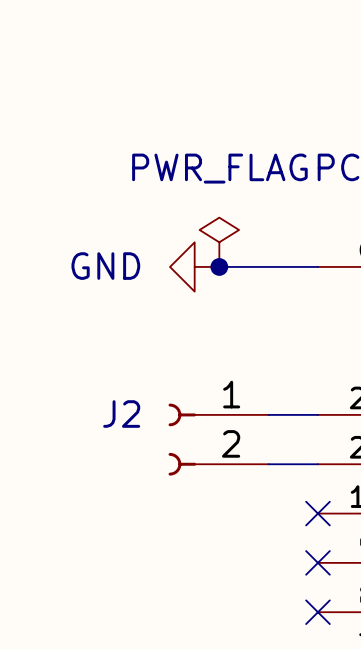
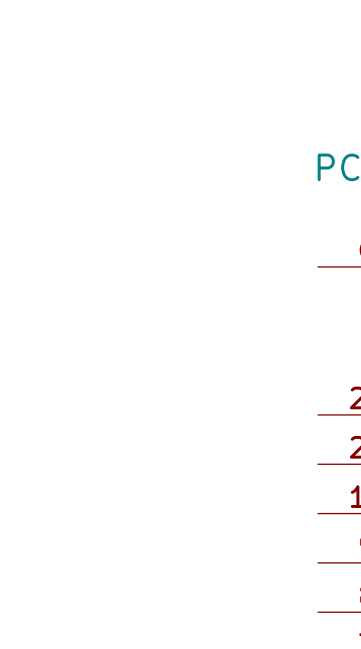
power symbol: PWR_FLAG (219, 242) -> none
power symbol: GND (194, 266) -> none
wire: (219, 266) (317, 266) -> none
junction: (219, 266) -> none
wire: (268, 414) (317, 414) -> none
J2: (218, 439) -> none
wire: (268, 464) (317, 464) -> none
no-connect mark: (317, 513) -> none
no-connect mark: (317, 562) -> none
no-connect mark: (317, 612) -> none

